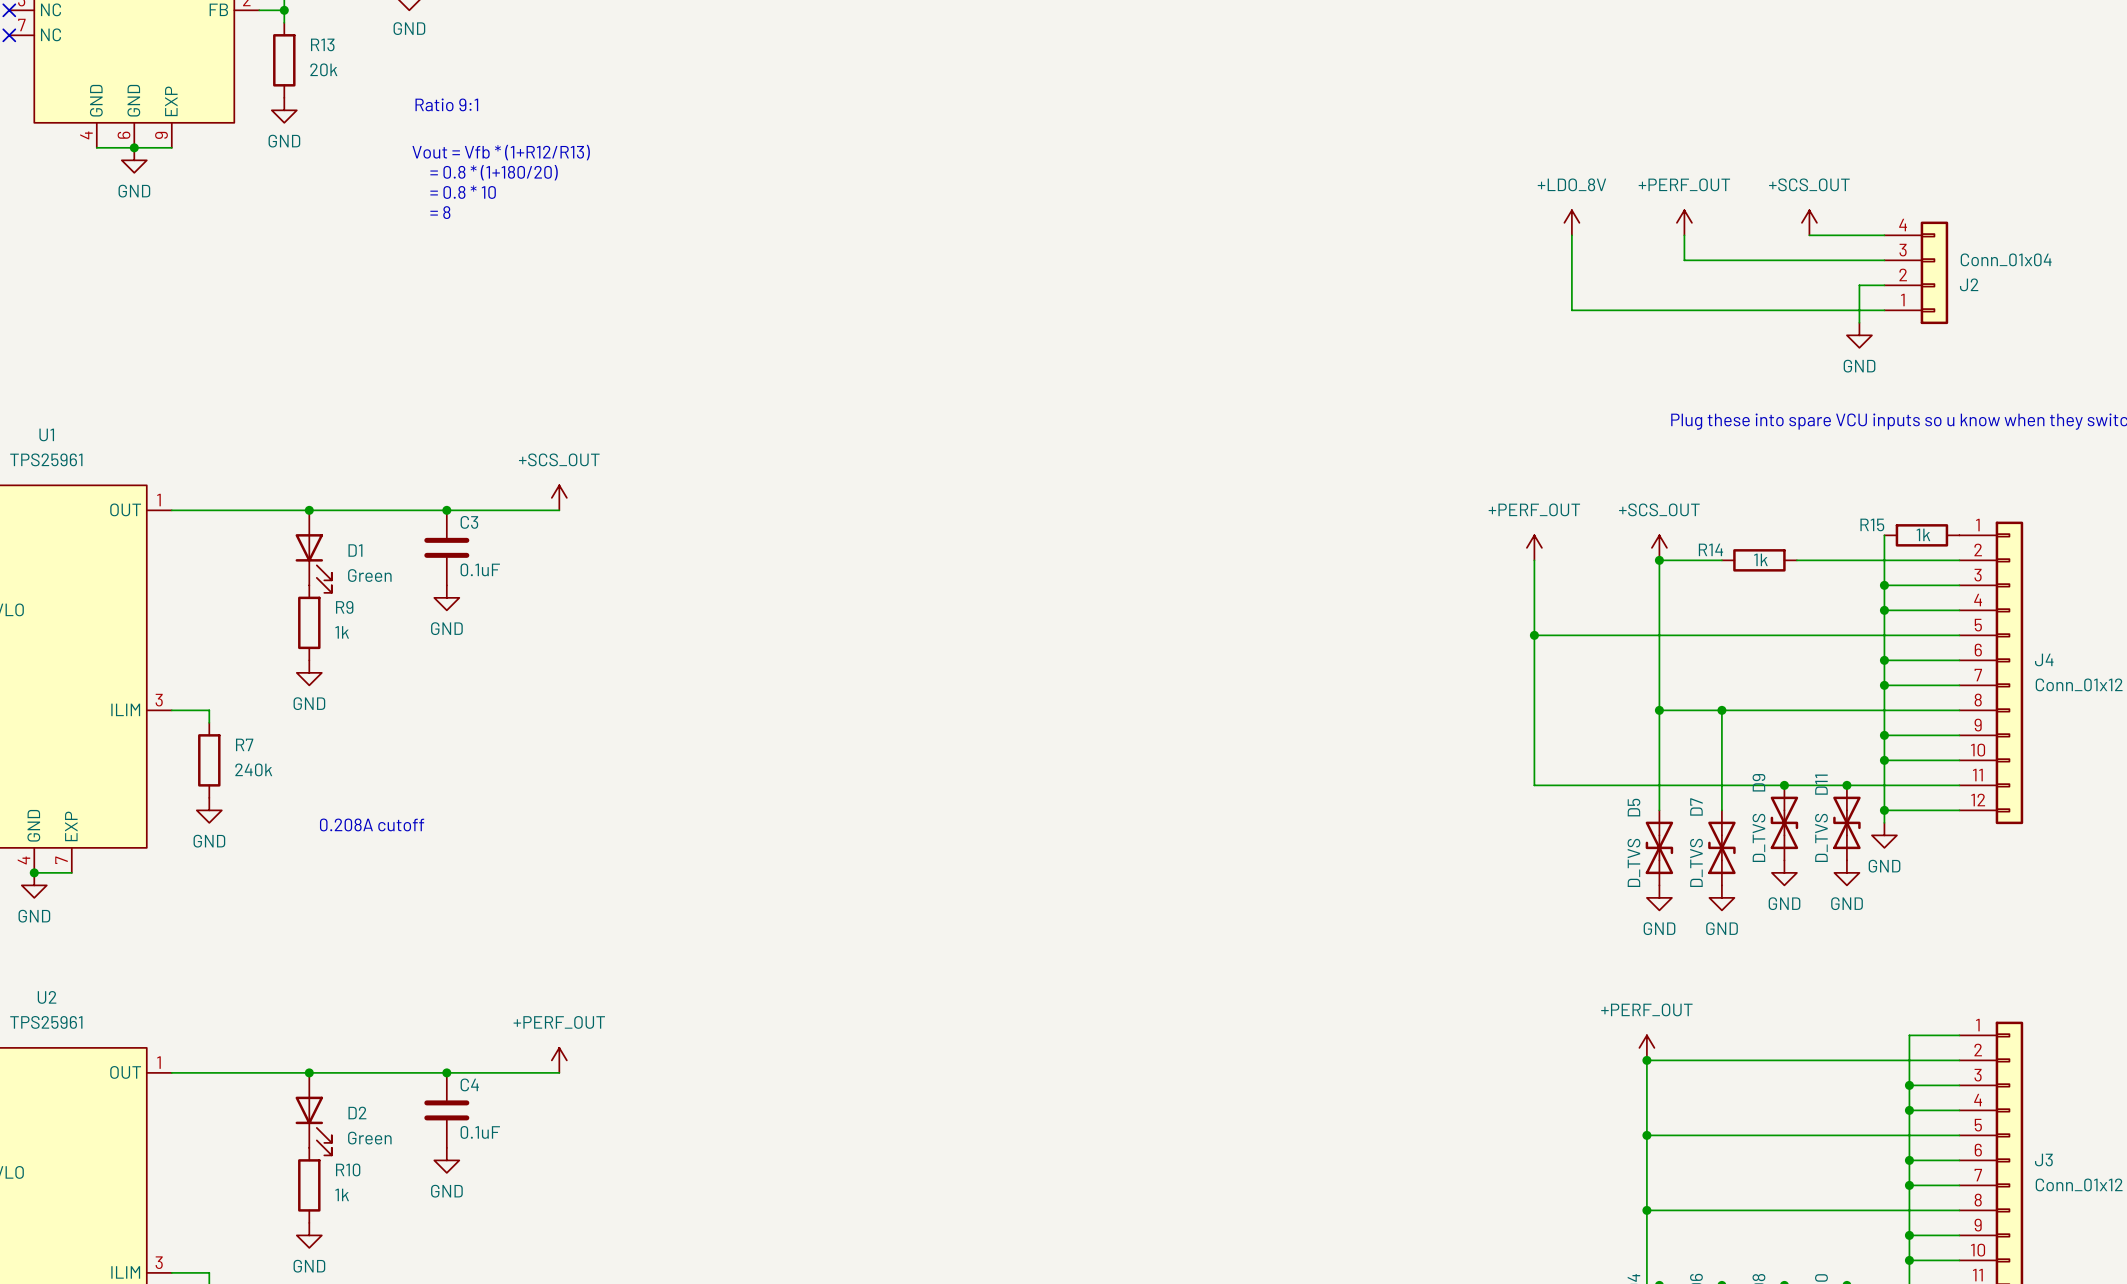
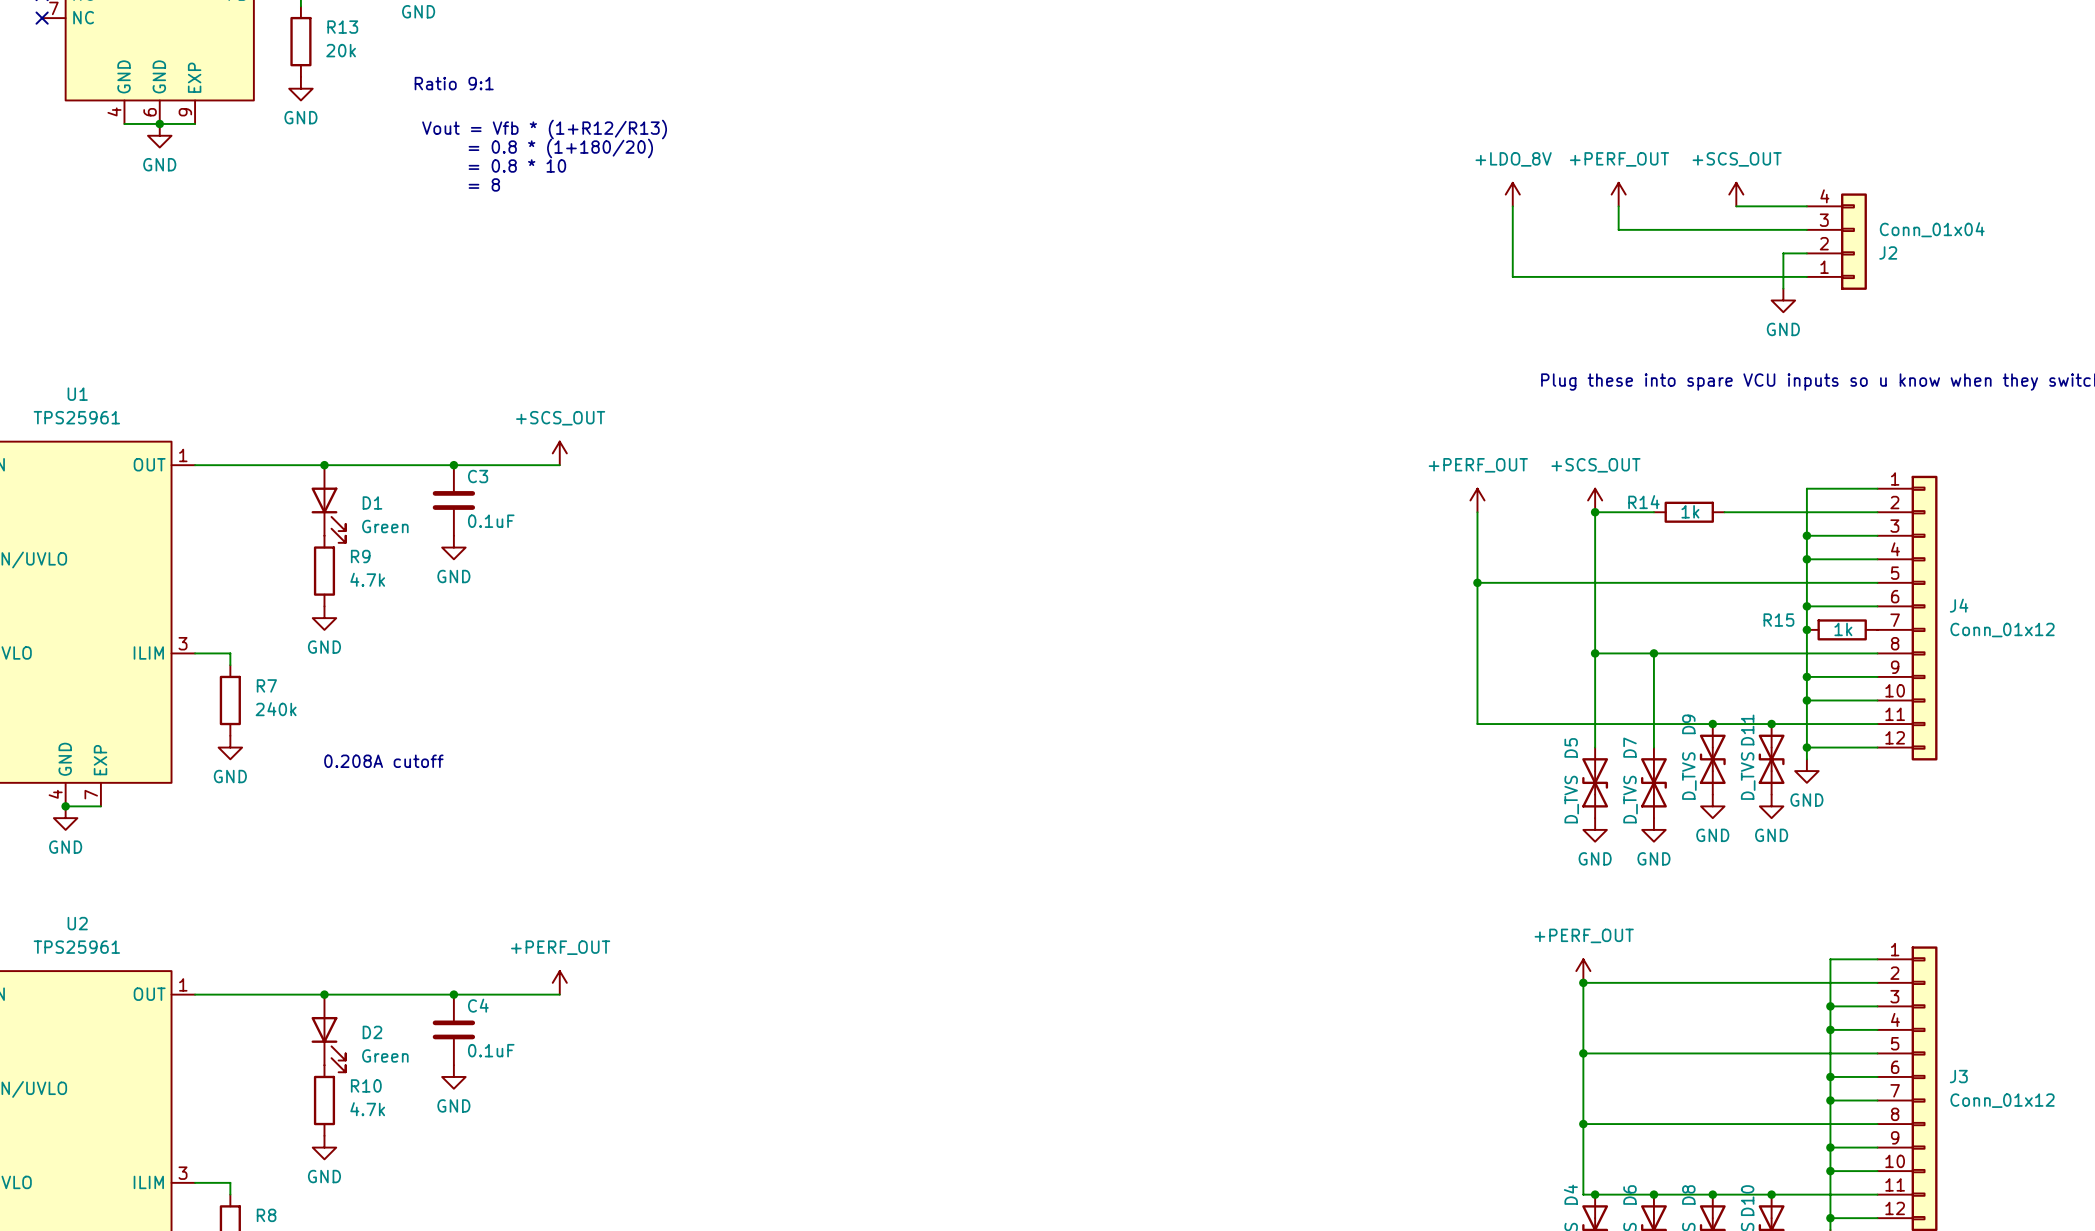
R15 name position: R15 (1872, 524) -> R15 (1778, 620)
R15 position: (1921, 535) -> (1842, 629)
R9 value: 1k (342, 632) -> 4.7k (367, 579)
wire: (1884, 685) (1959, 685) -> (1806, 488) (1877, 488)
R10 value: 1k (342, 1194) -> 4.7k (367, 1109)

